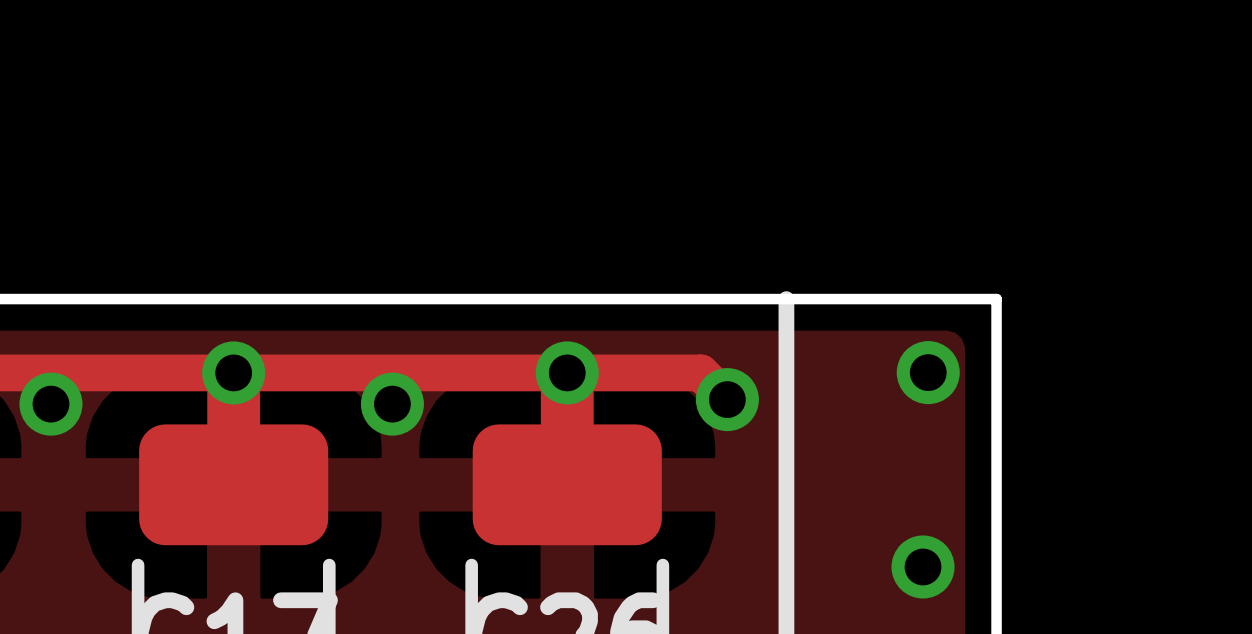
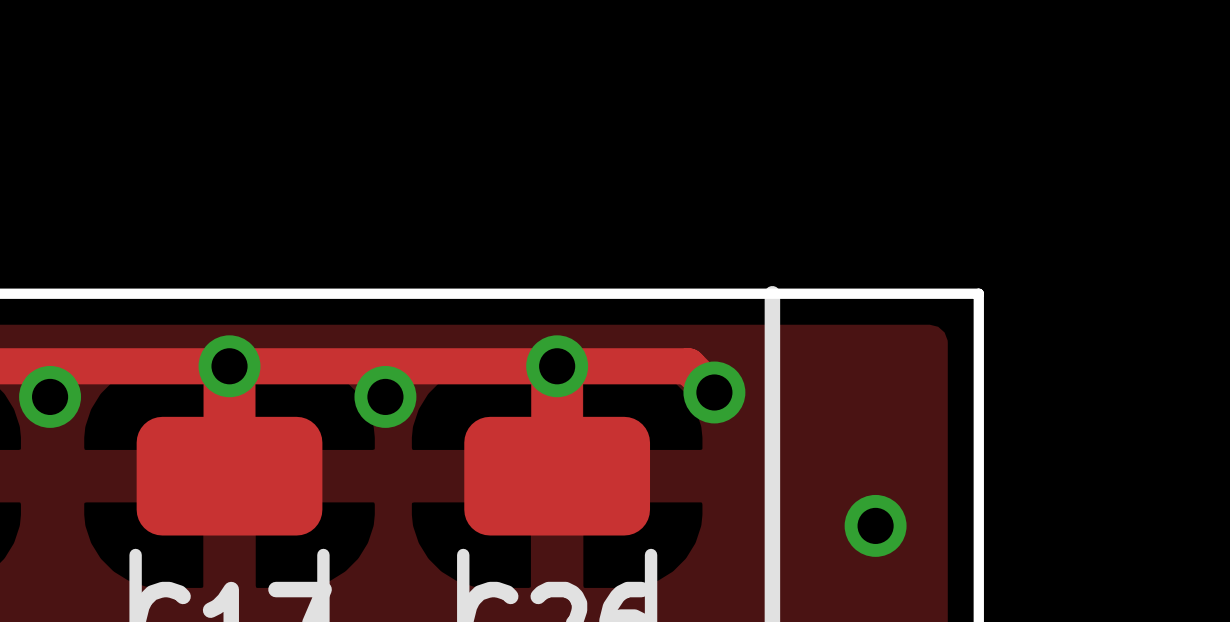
via: (928, 372) -> none
via position: (923, 566) -> (875, 525)

